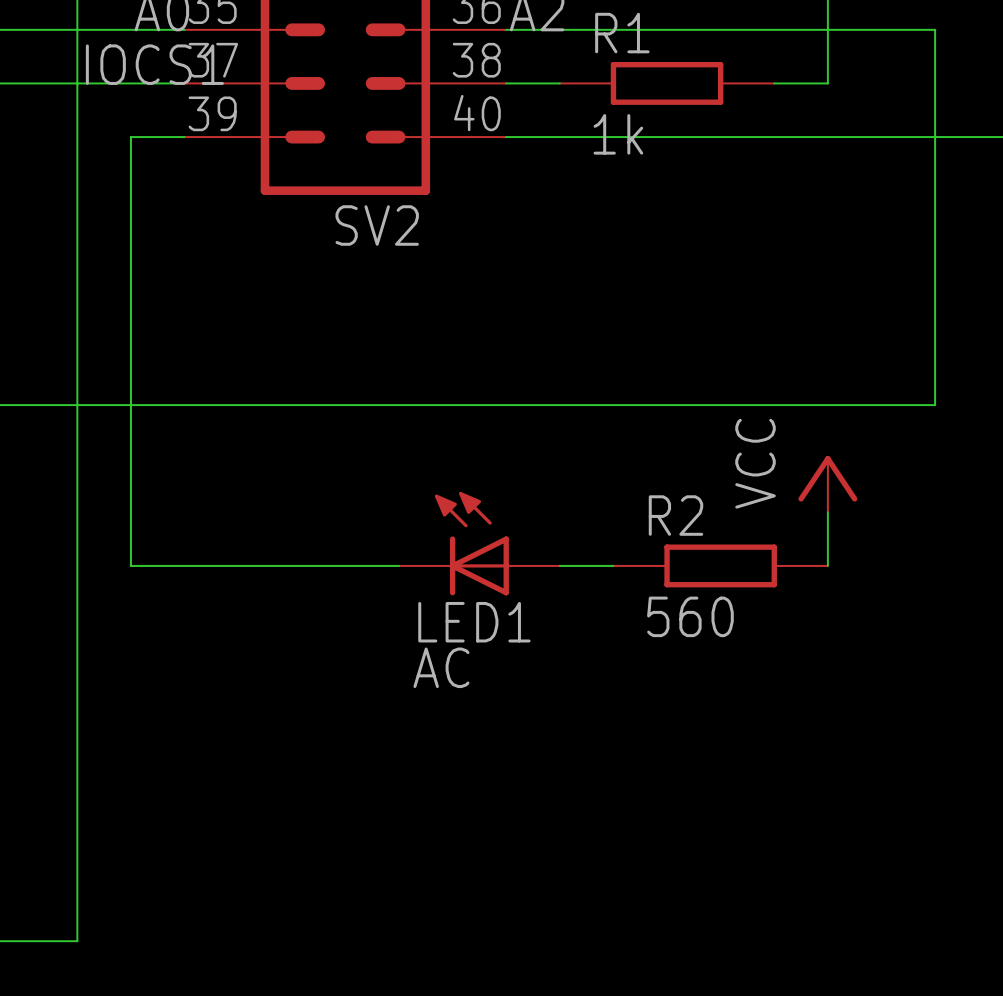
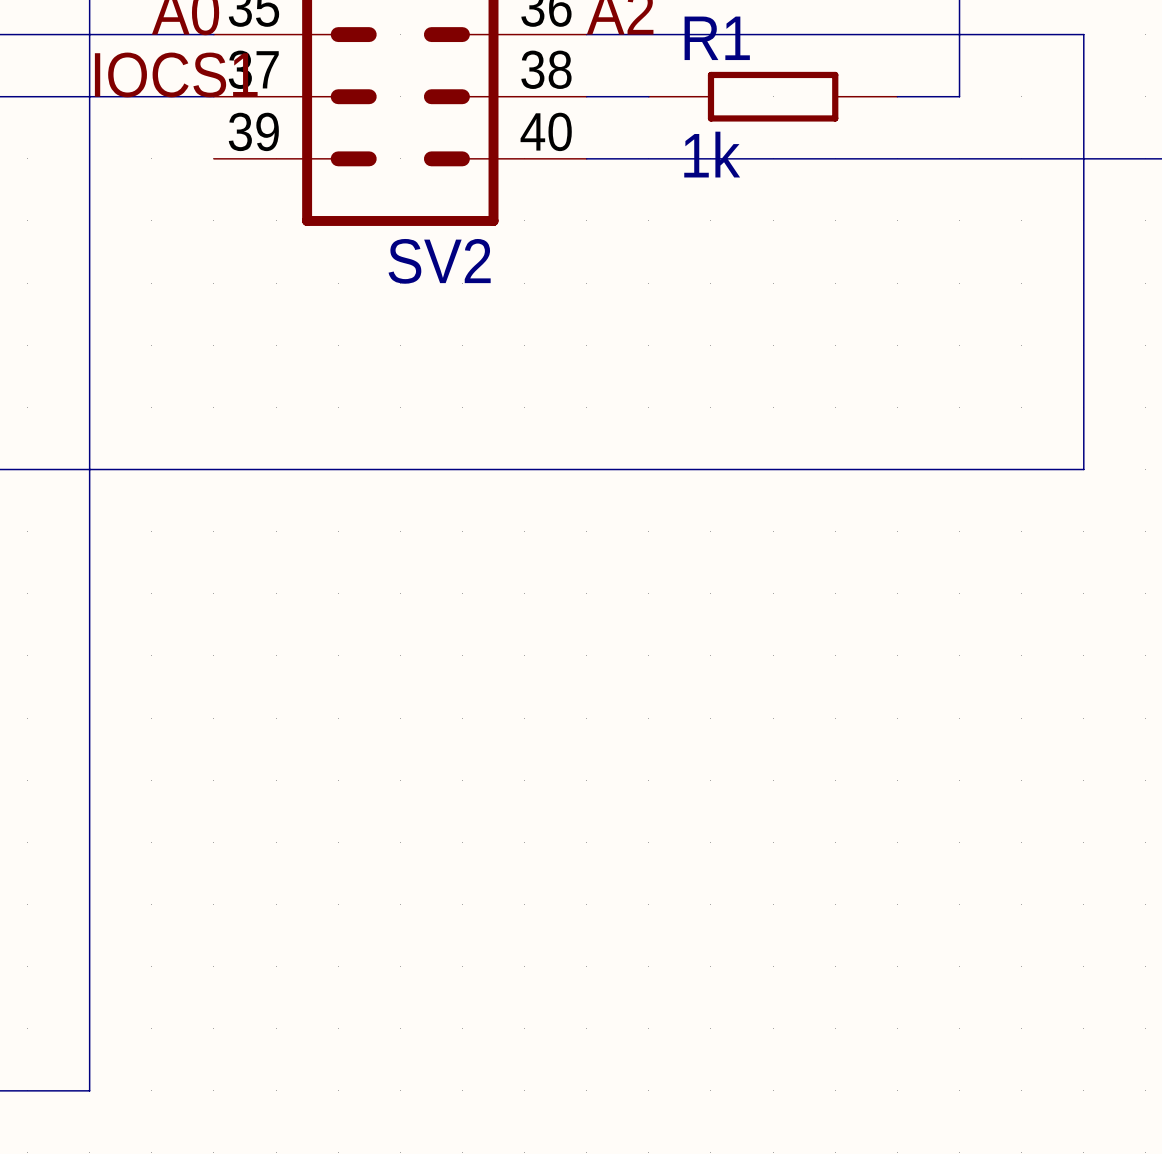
wire: (184, 137) (130, 137) (130, 565) (399, 565) -> none
power symbol: VCC (827, 484) -> none
wire: (827, 512) (827, 565) -> none
LED1: AC (479, 543) -> none
wire: (559, 565) (613, 565) -> none
R2: 560 (720, 565) -> none

